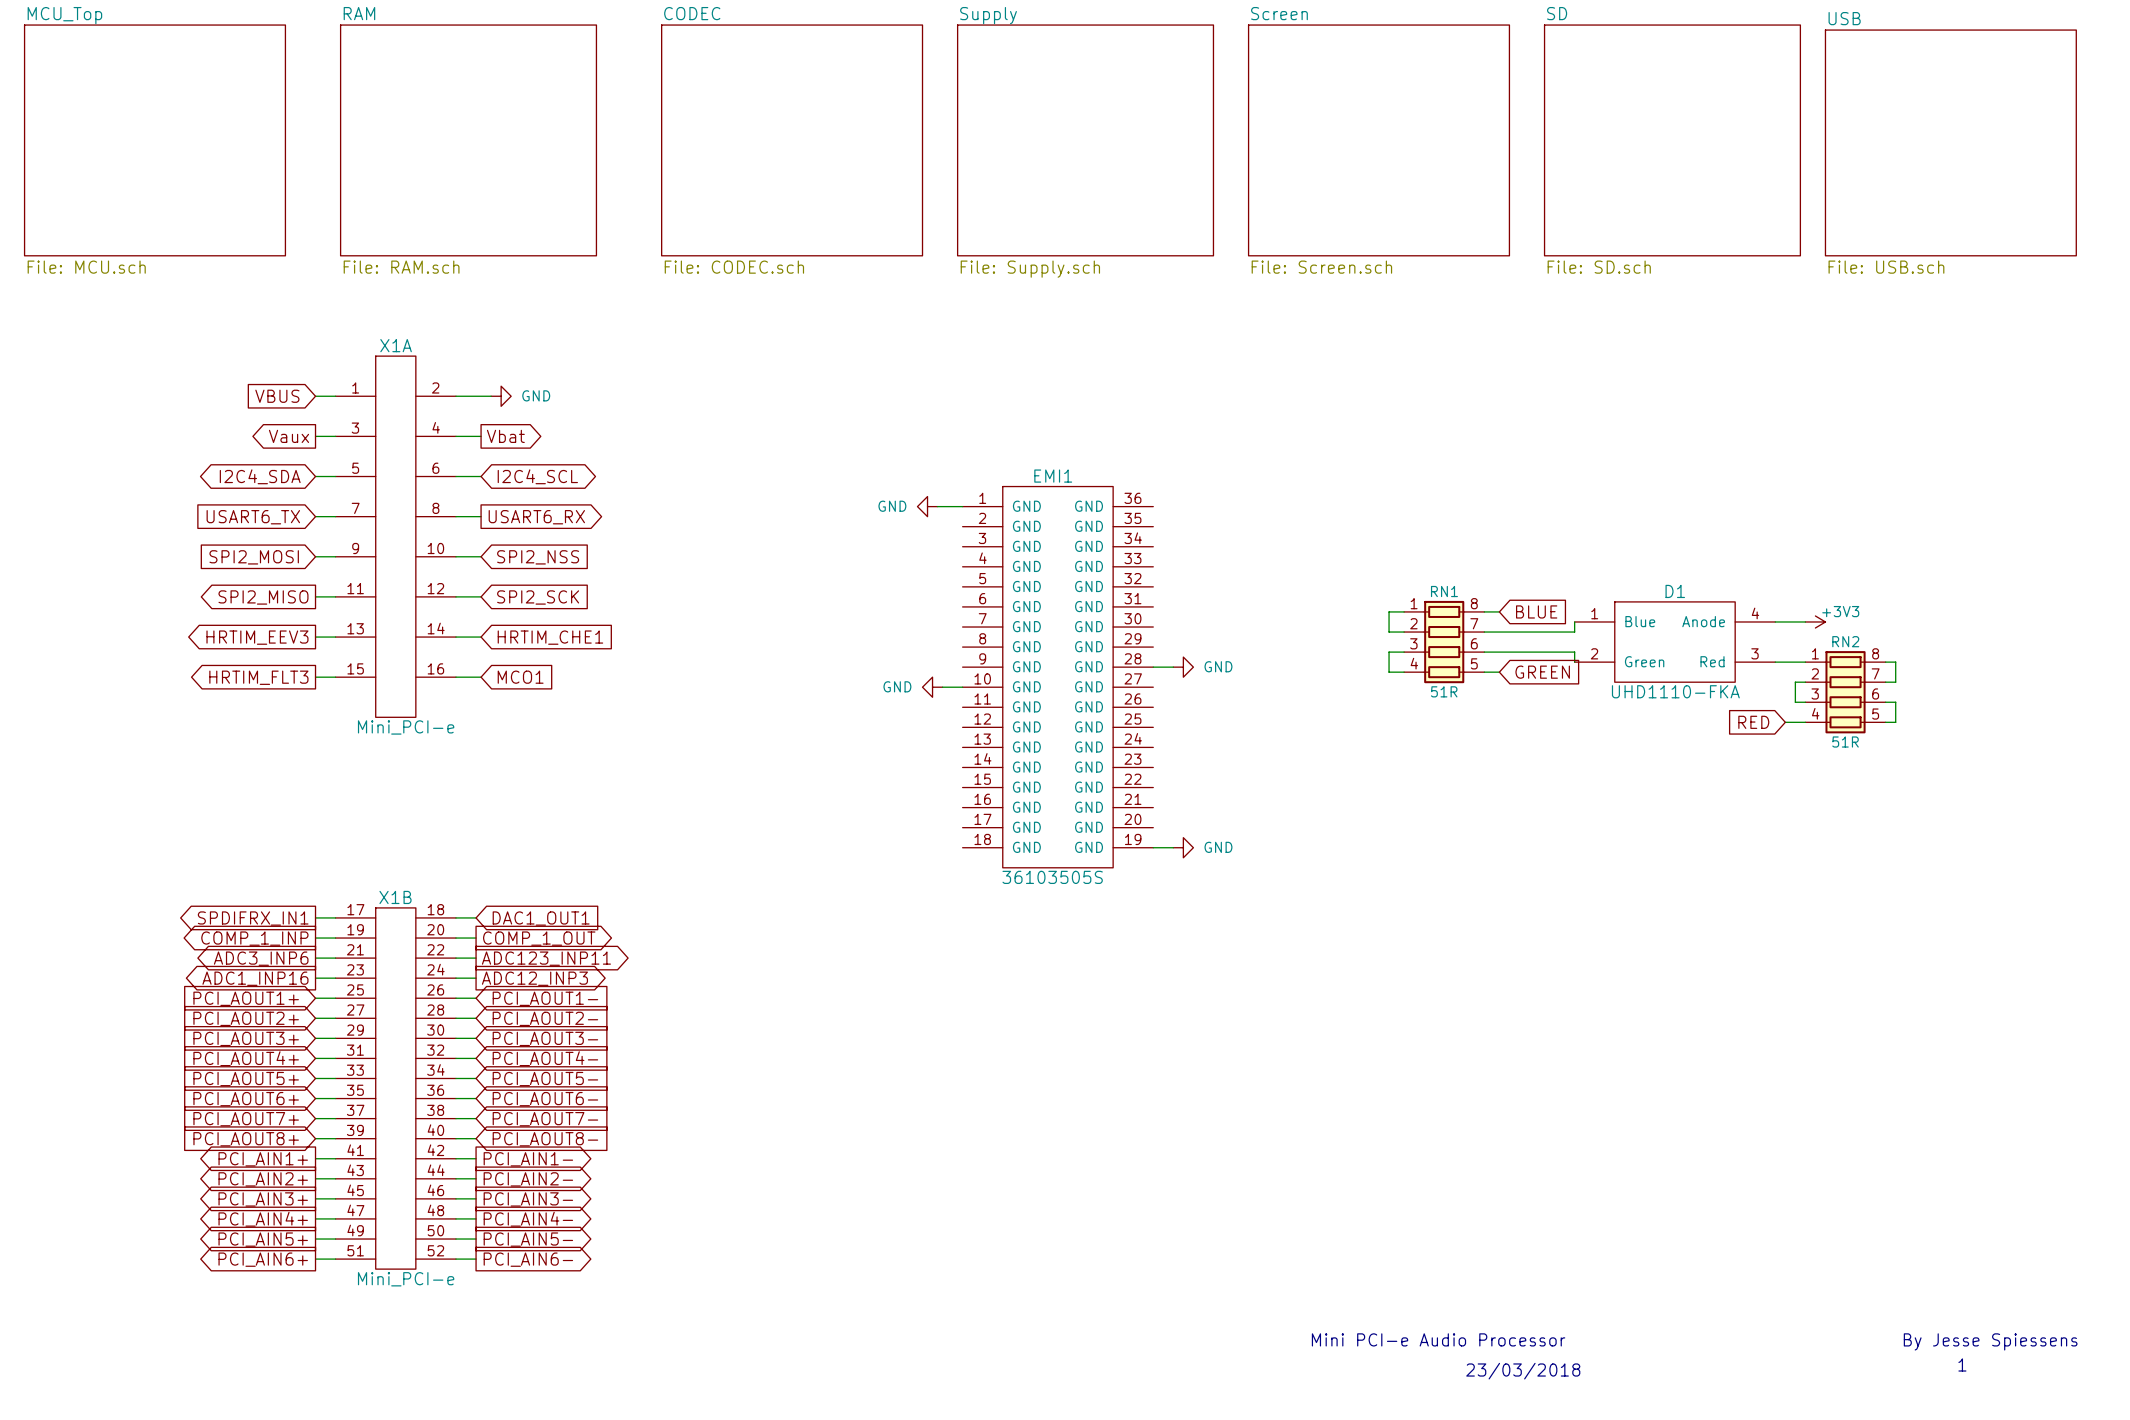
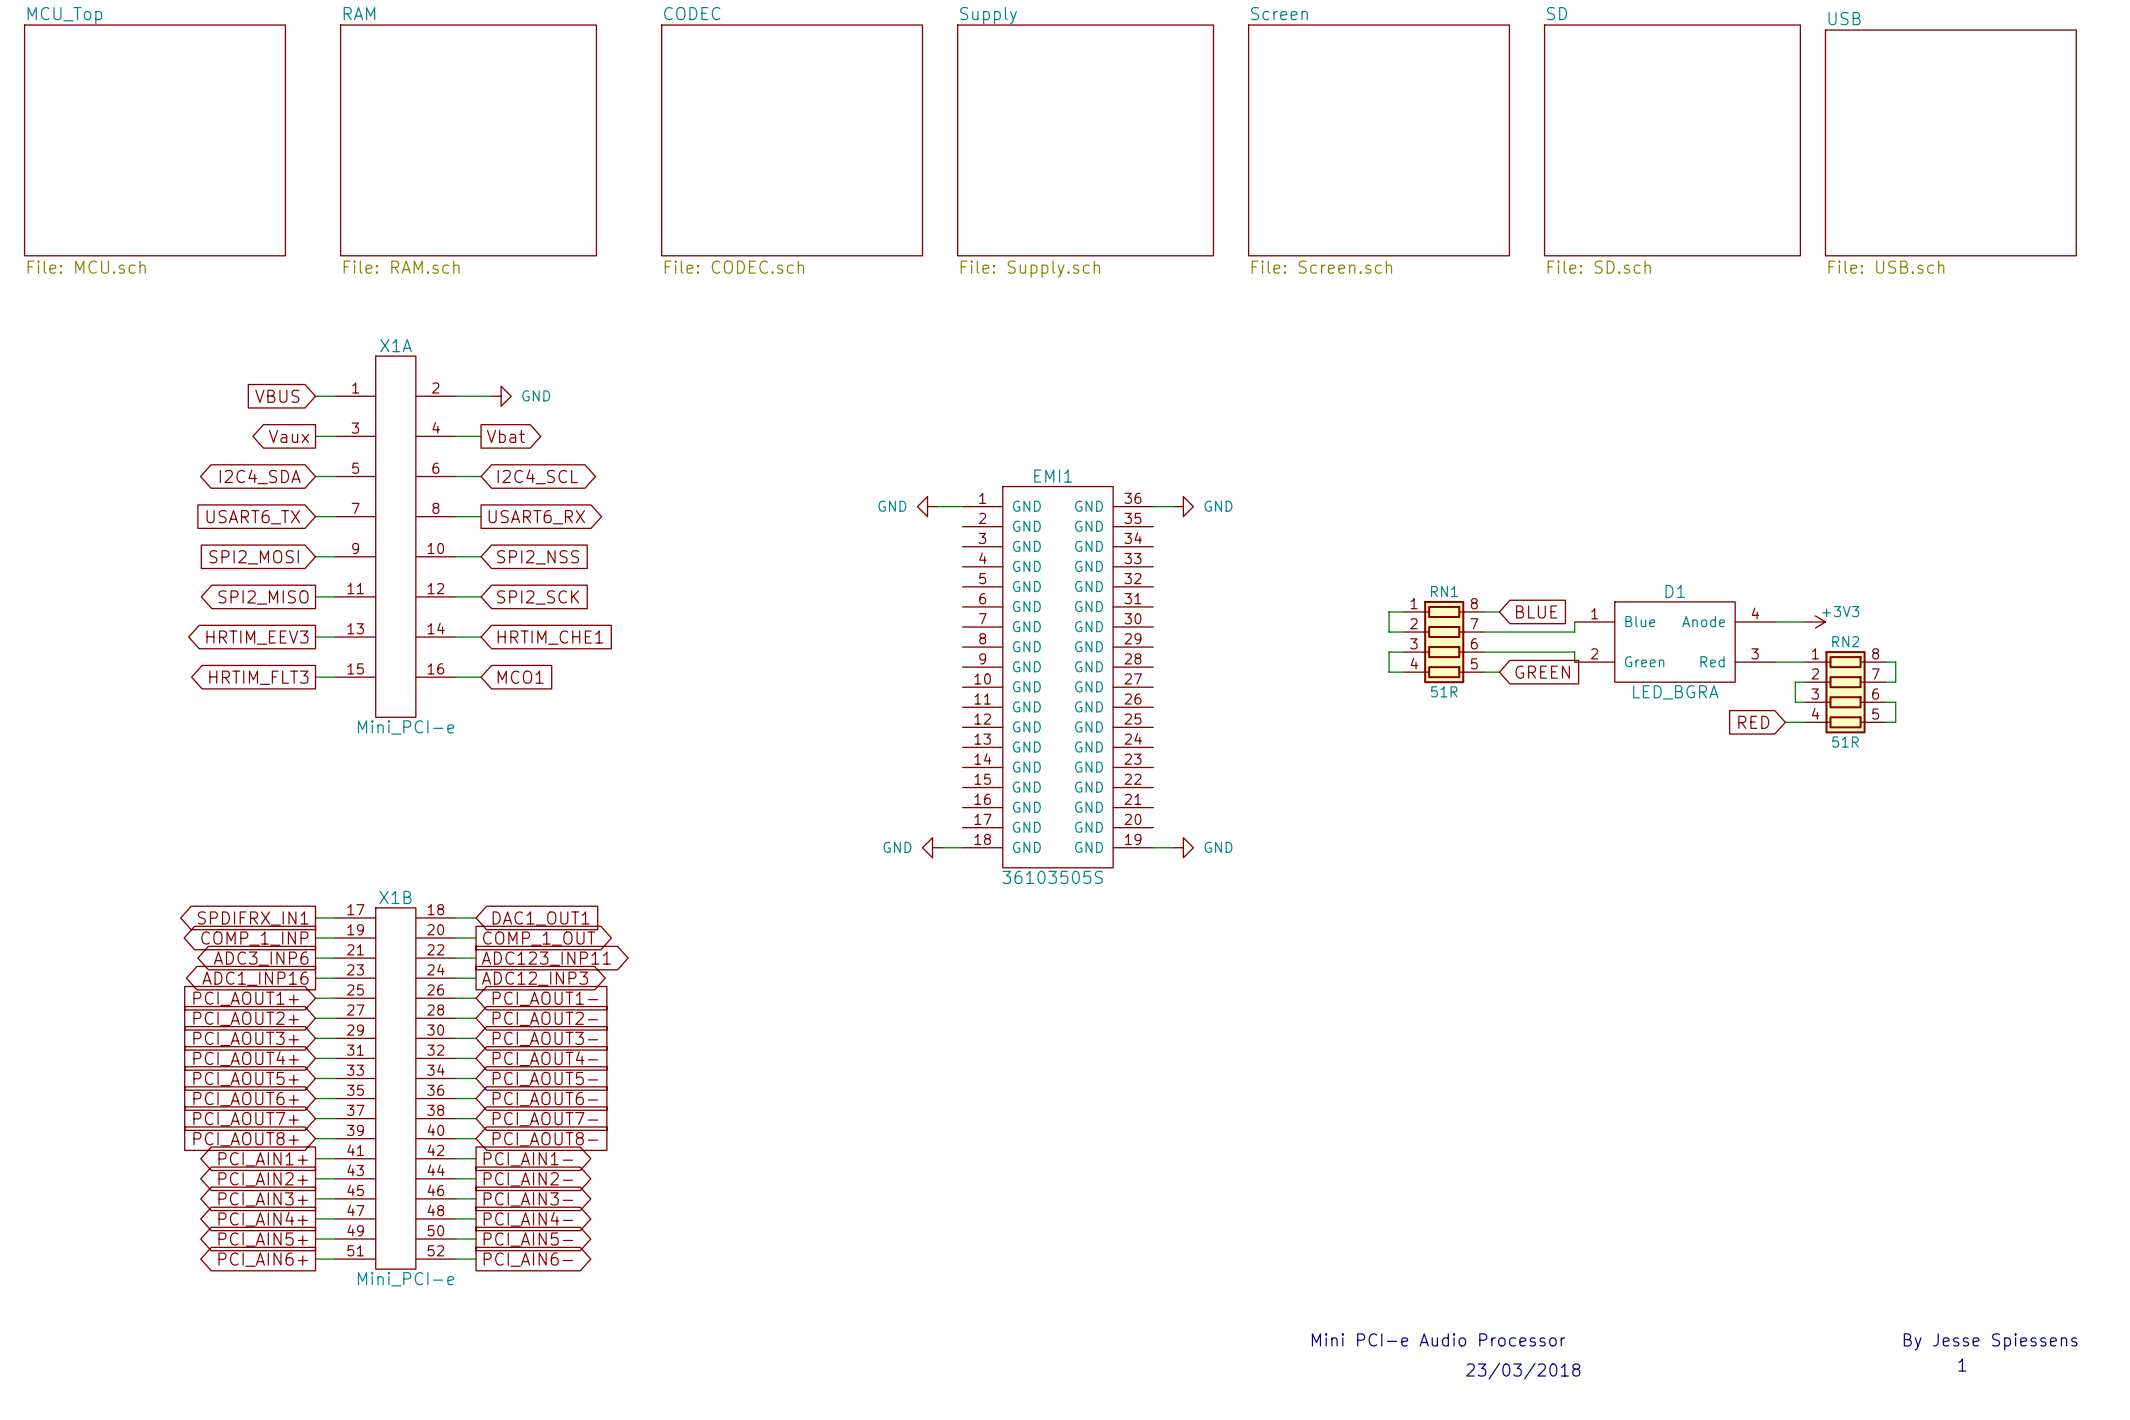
power symbol: none -> GND (1183, 506)
wire: (1153, 667) (1173, 667) -> (1153, 506) (1173, 506)
power symbol: GND (1183, 667) -> none
power symbol: GND (932, 687) -> none
wire: (942, 687) (962, 687) -> (942, 847) (962, 847)
D1 value: UHD1110-FKA (1675, 691) -> LED_BGRA (1675, 692)
power symbol: none -> GND (932, 847)

